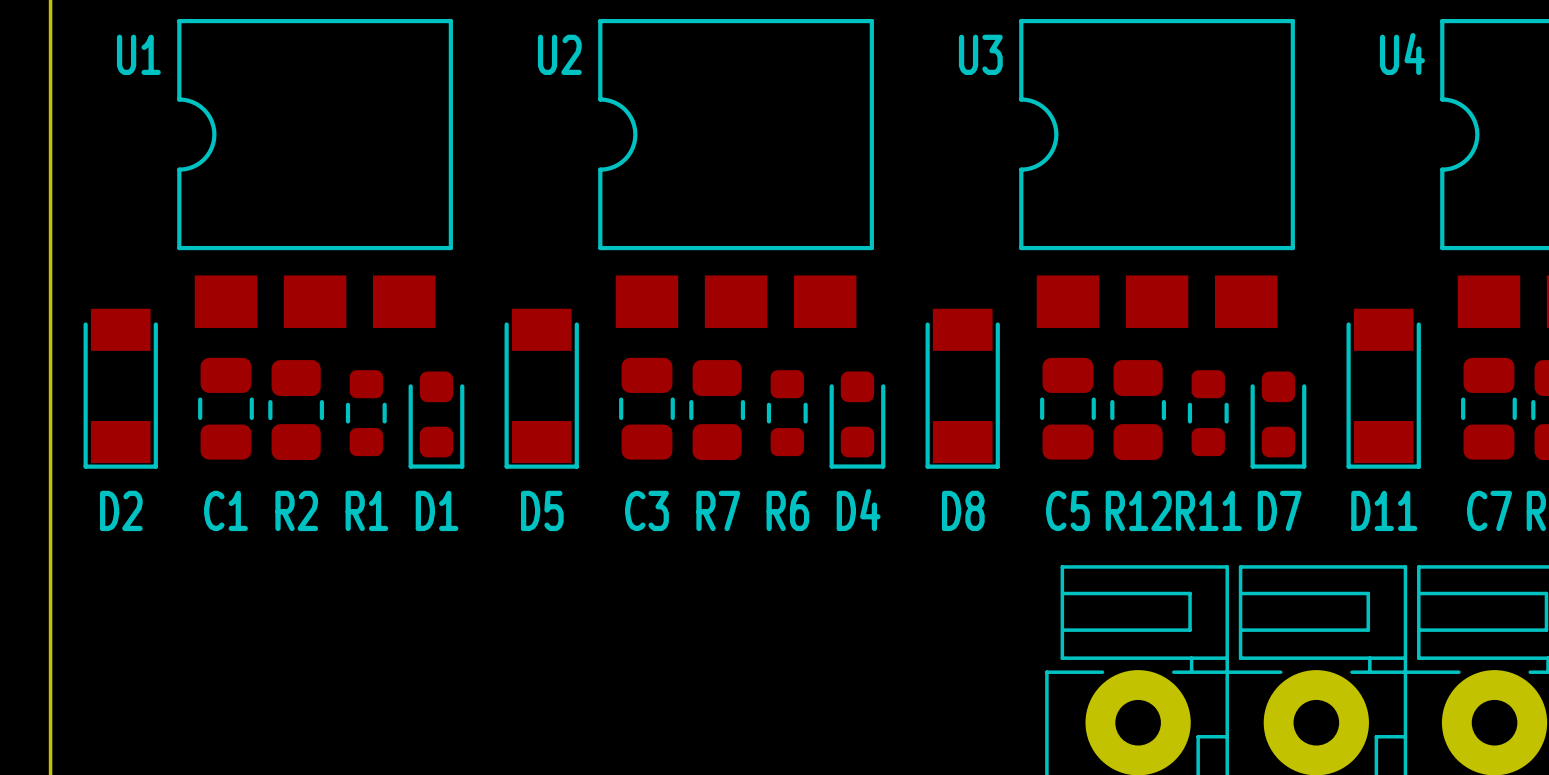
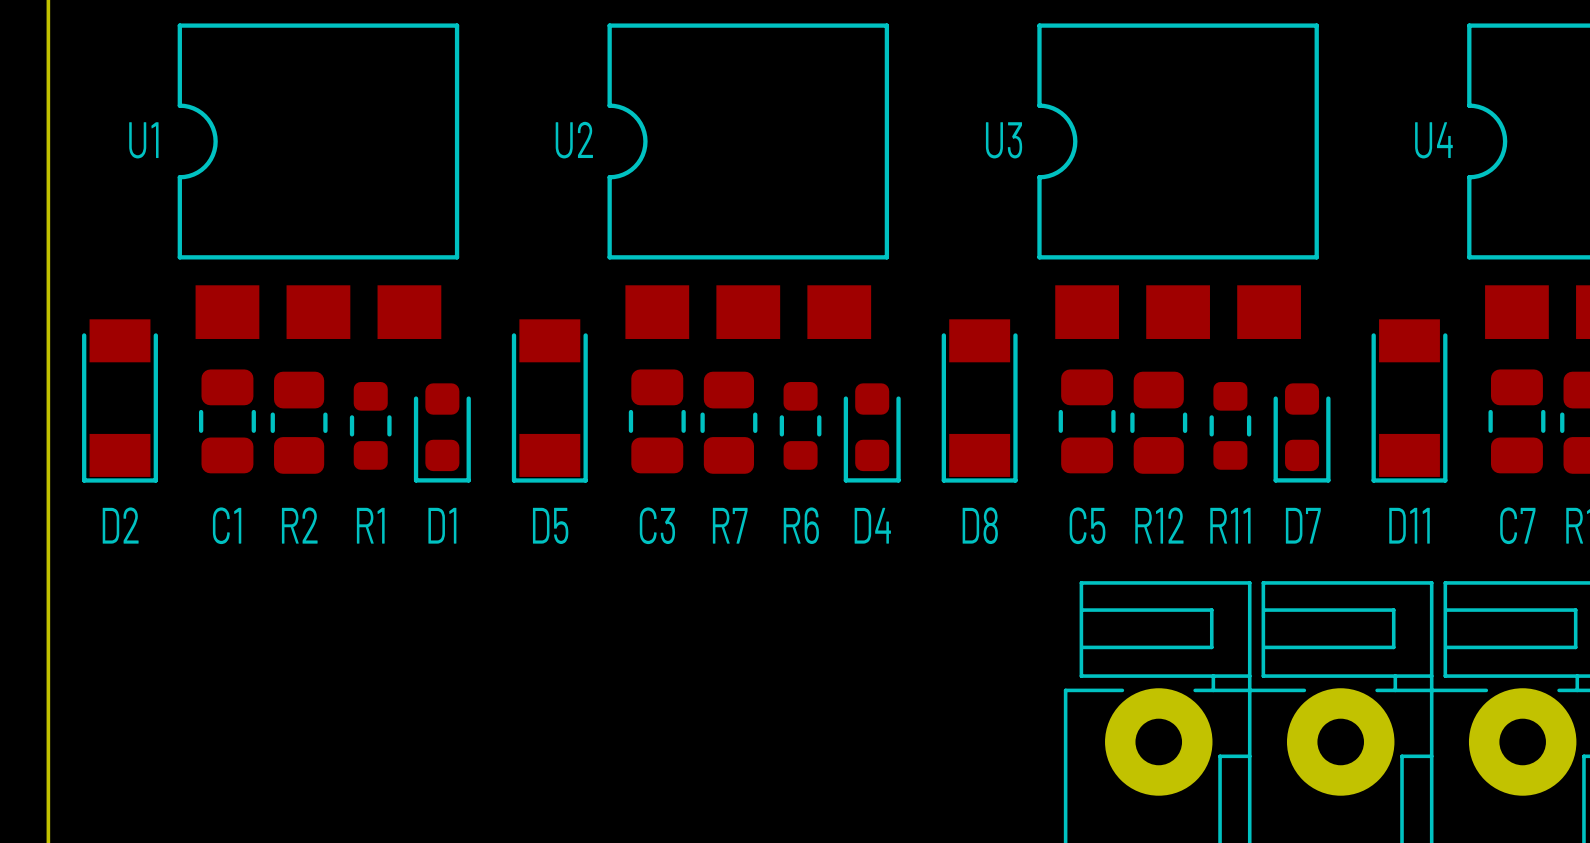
U1 name position: U1 (138, 54) -> U1 (143, 140)
U2 name position: U2 (559, 54) -> U2 (574, 140)
U3 name position: U3 (980, 54) -> U3 (1004, 140)
U4 name position: U4 (1402, 54) -> U4 (1433, 140)

